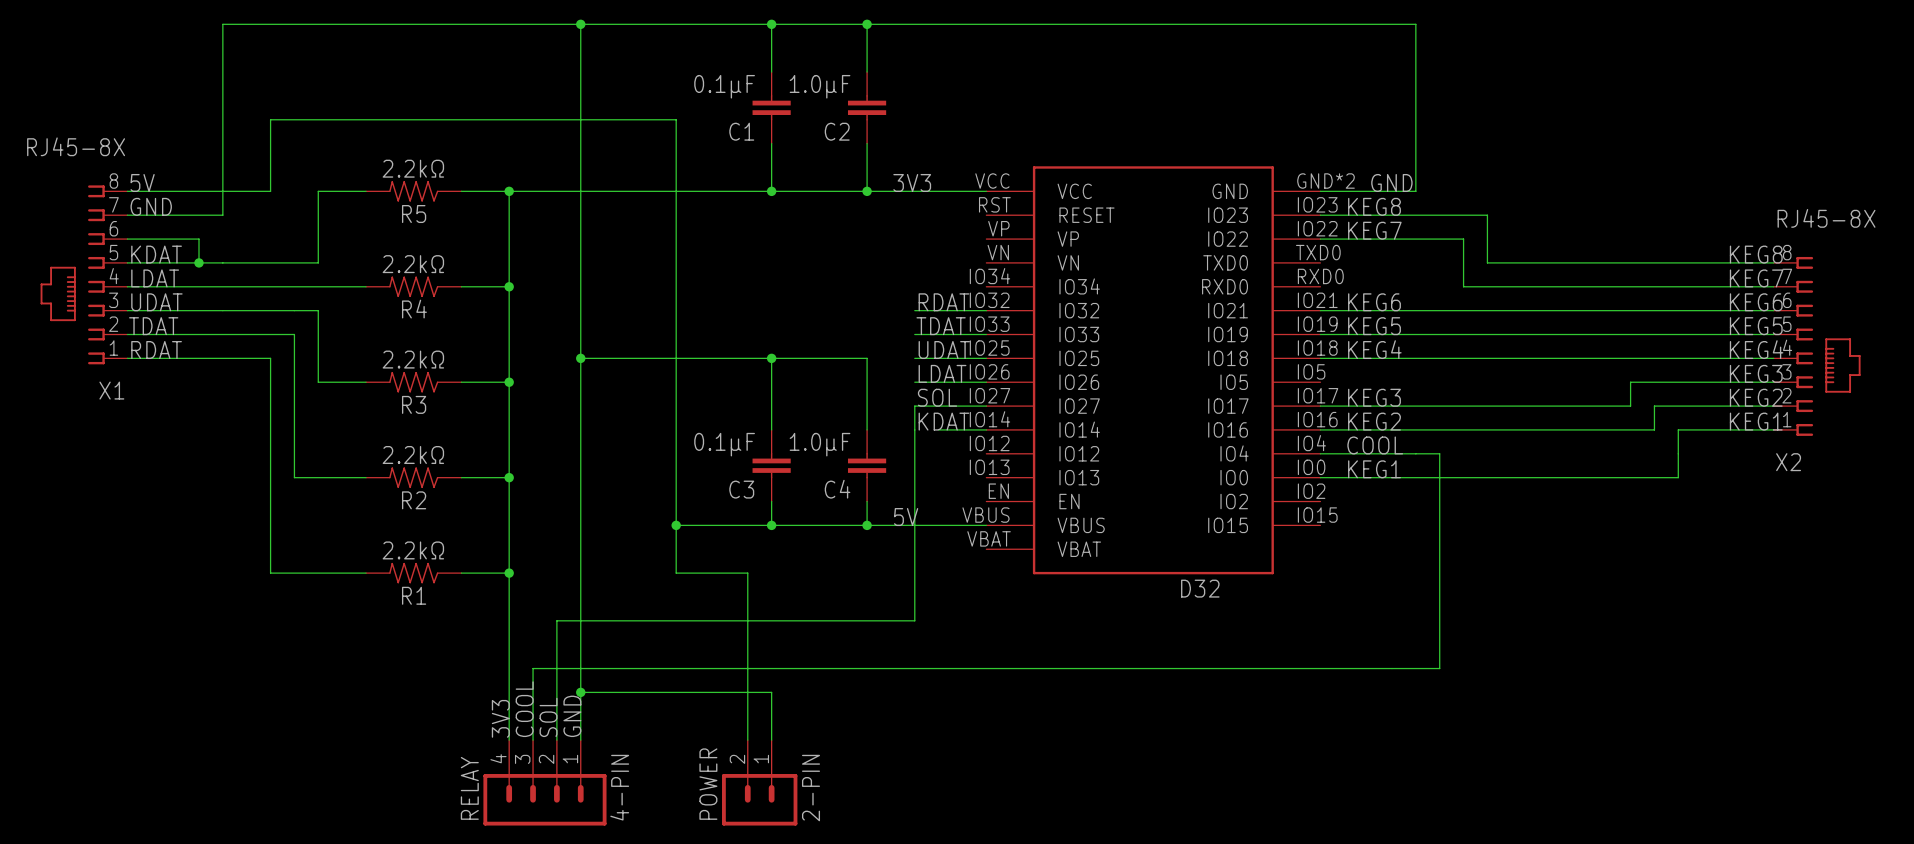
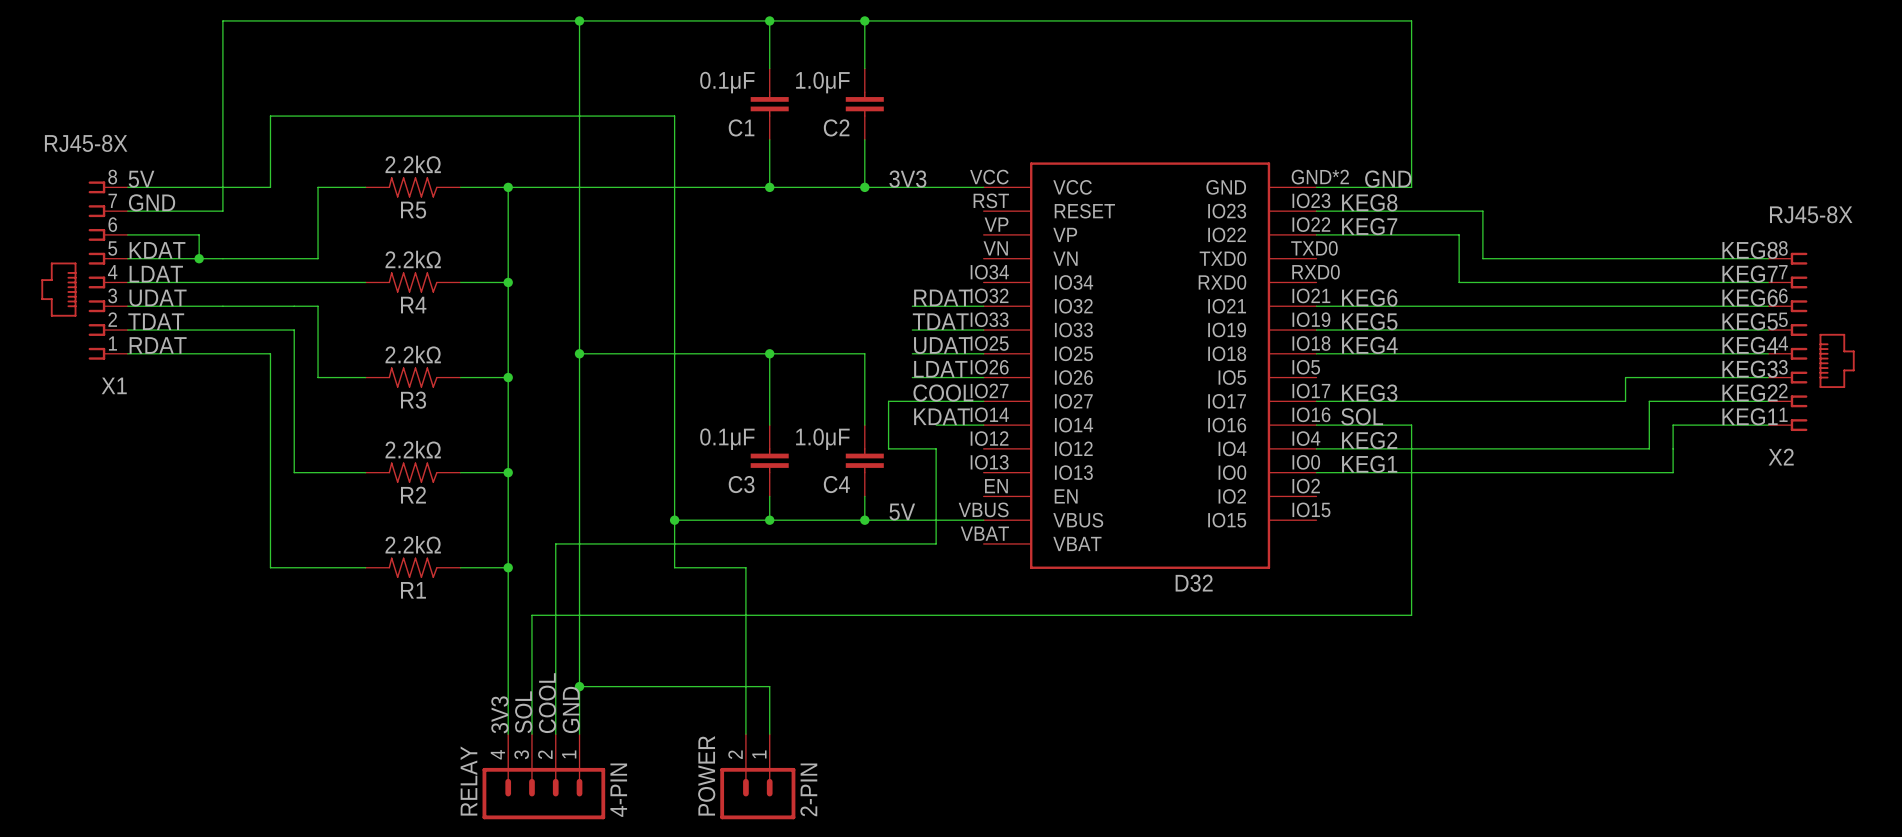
label: SOL (937, 397) -> COOL (943, 393)
wire: (914, 406) (914, 620) -> (912, 401) (888, 401) (888, 448) (936, 448) (936, 543) (555, 543) (555, 615) (531, 615) (531, 662)
label: KEG2 (1374, 421) -> SOL (1362, 416)
wire: (1415, 429) (1654, 429) -> (1435, 448) (1649, 448) (1649, 425)
wire: none -> (1411, 425) (1411, 615) (912, 615)
label: COOL (1375, 445) -> KEG2 (1369, 440)
wire: (1439, 453) (1439, 668) (533, 668) -> none
label: COOL (524, 709) -> SOL (523, 712)
label: SOL (548, 717) -> COOL (547, 703)

